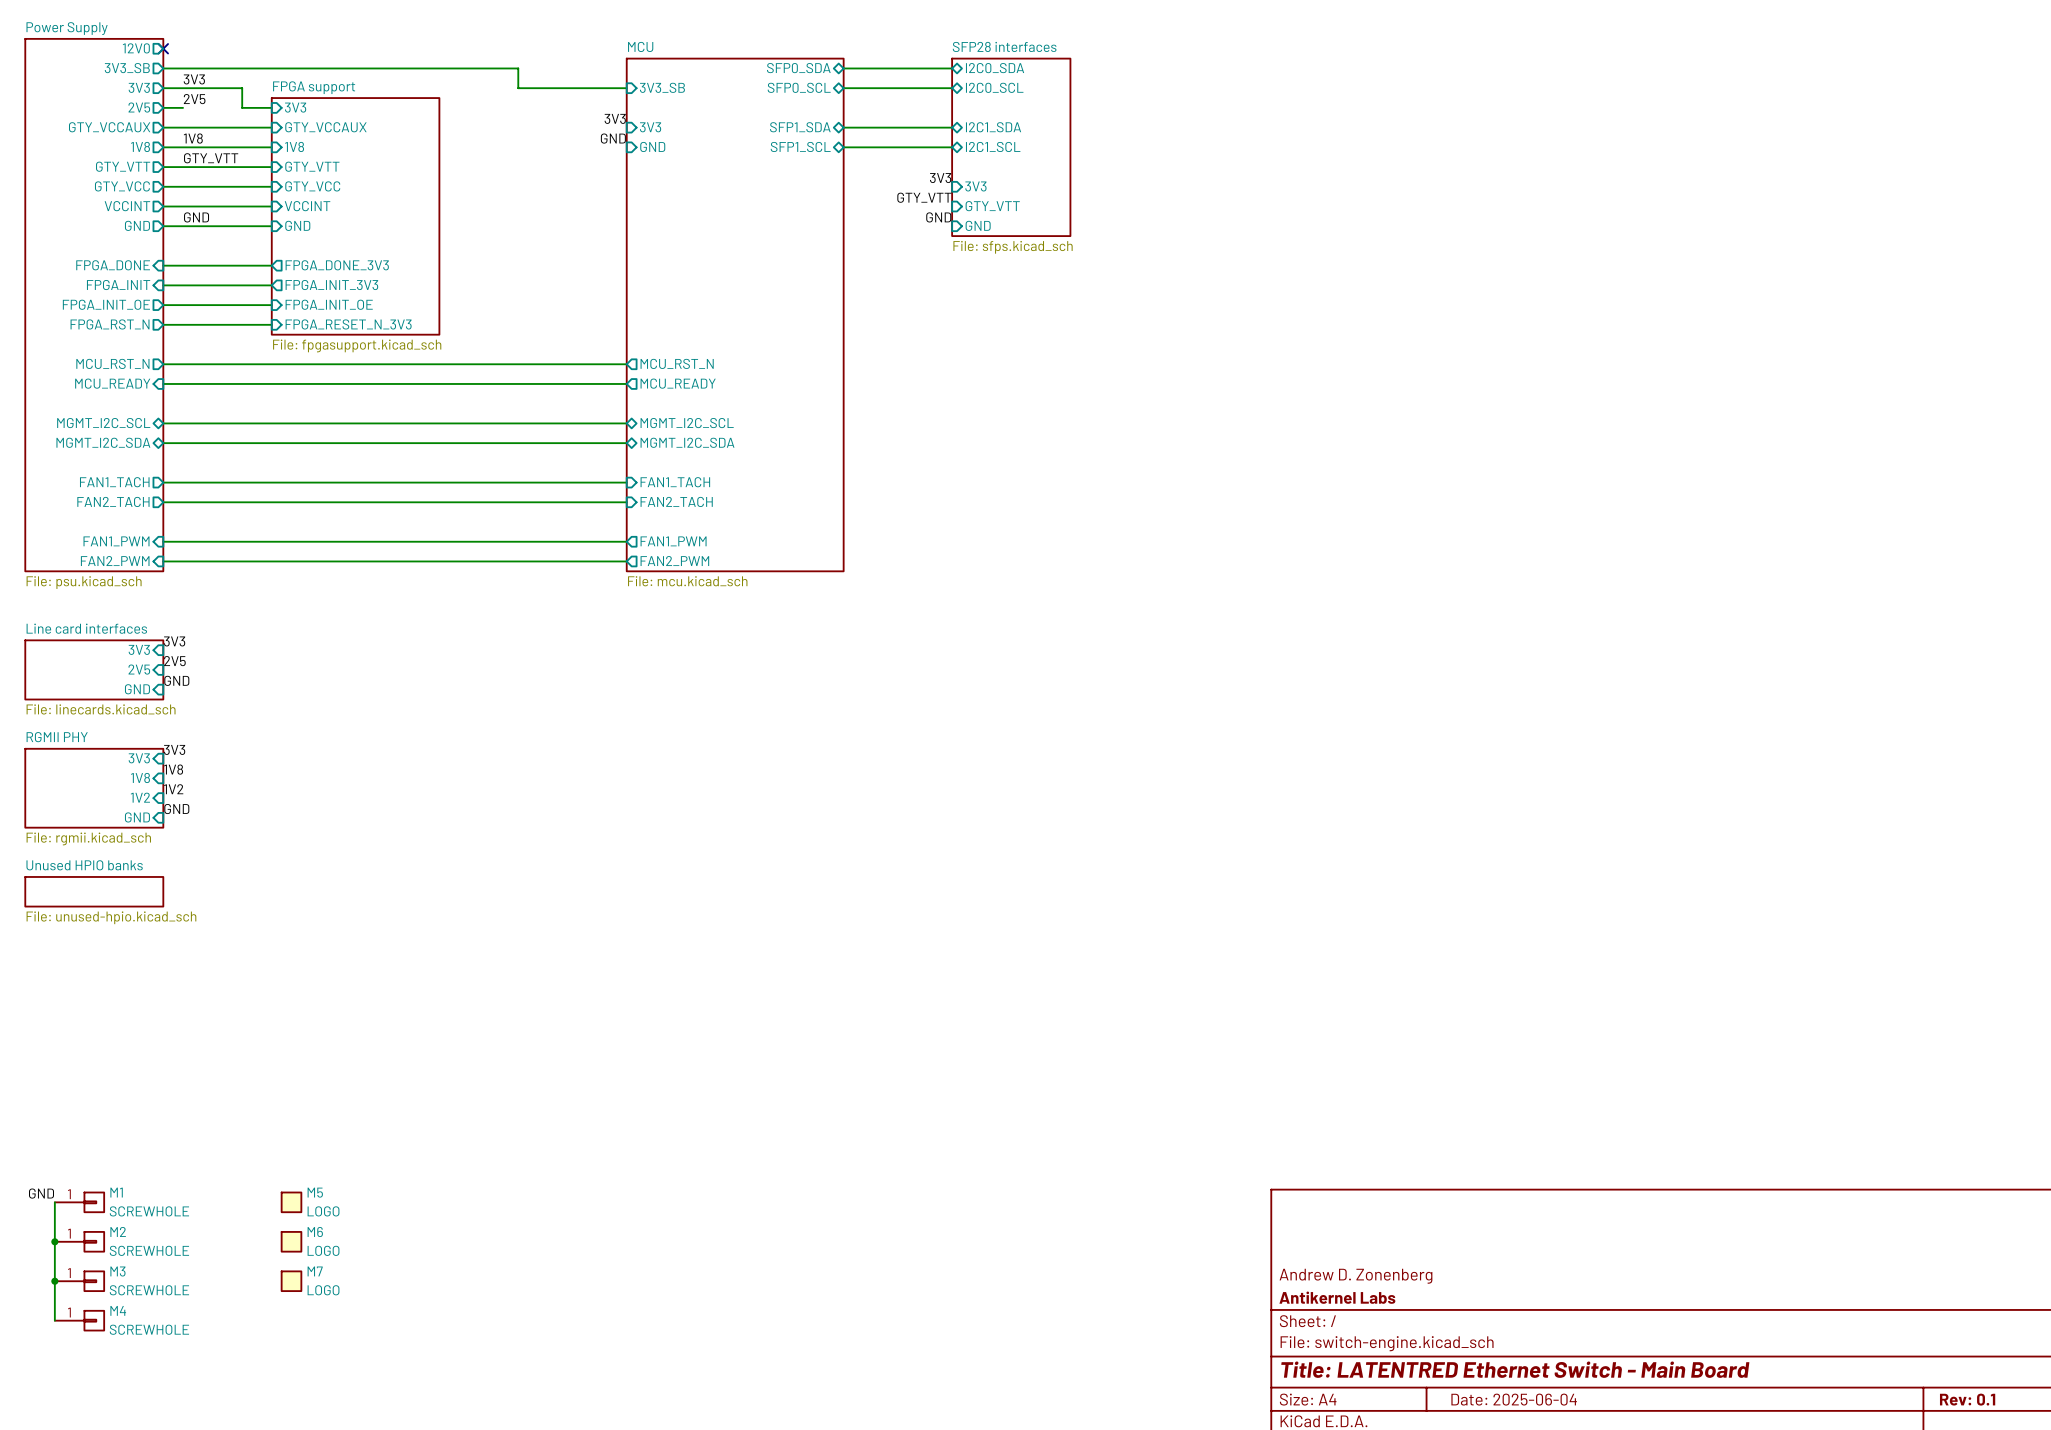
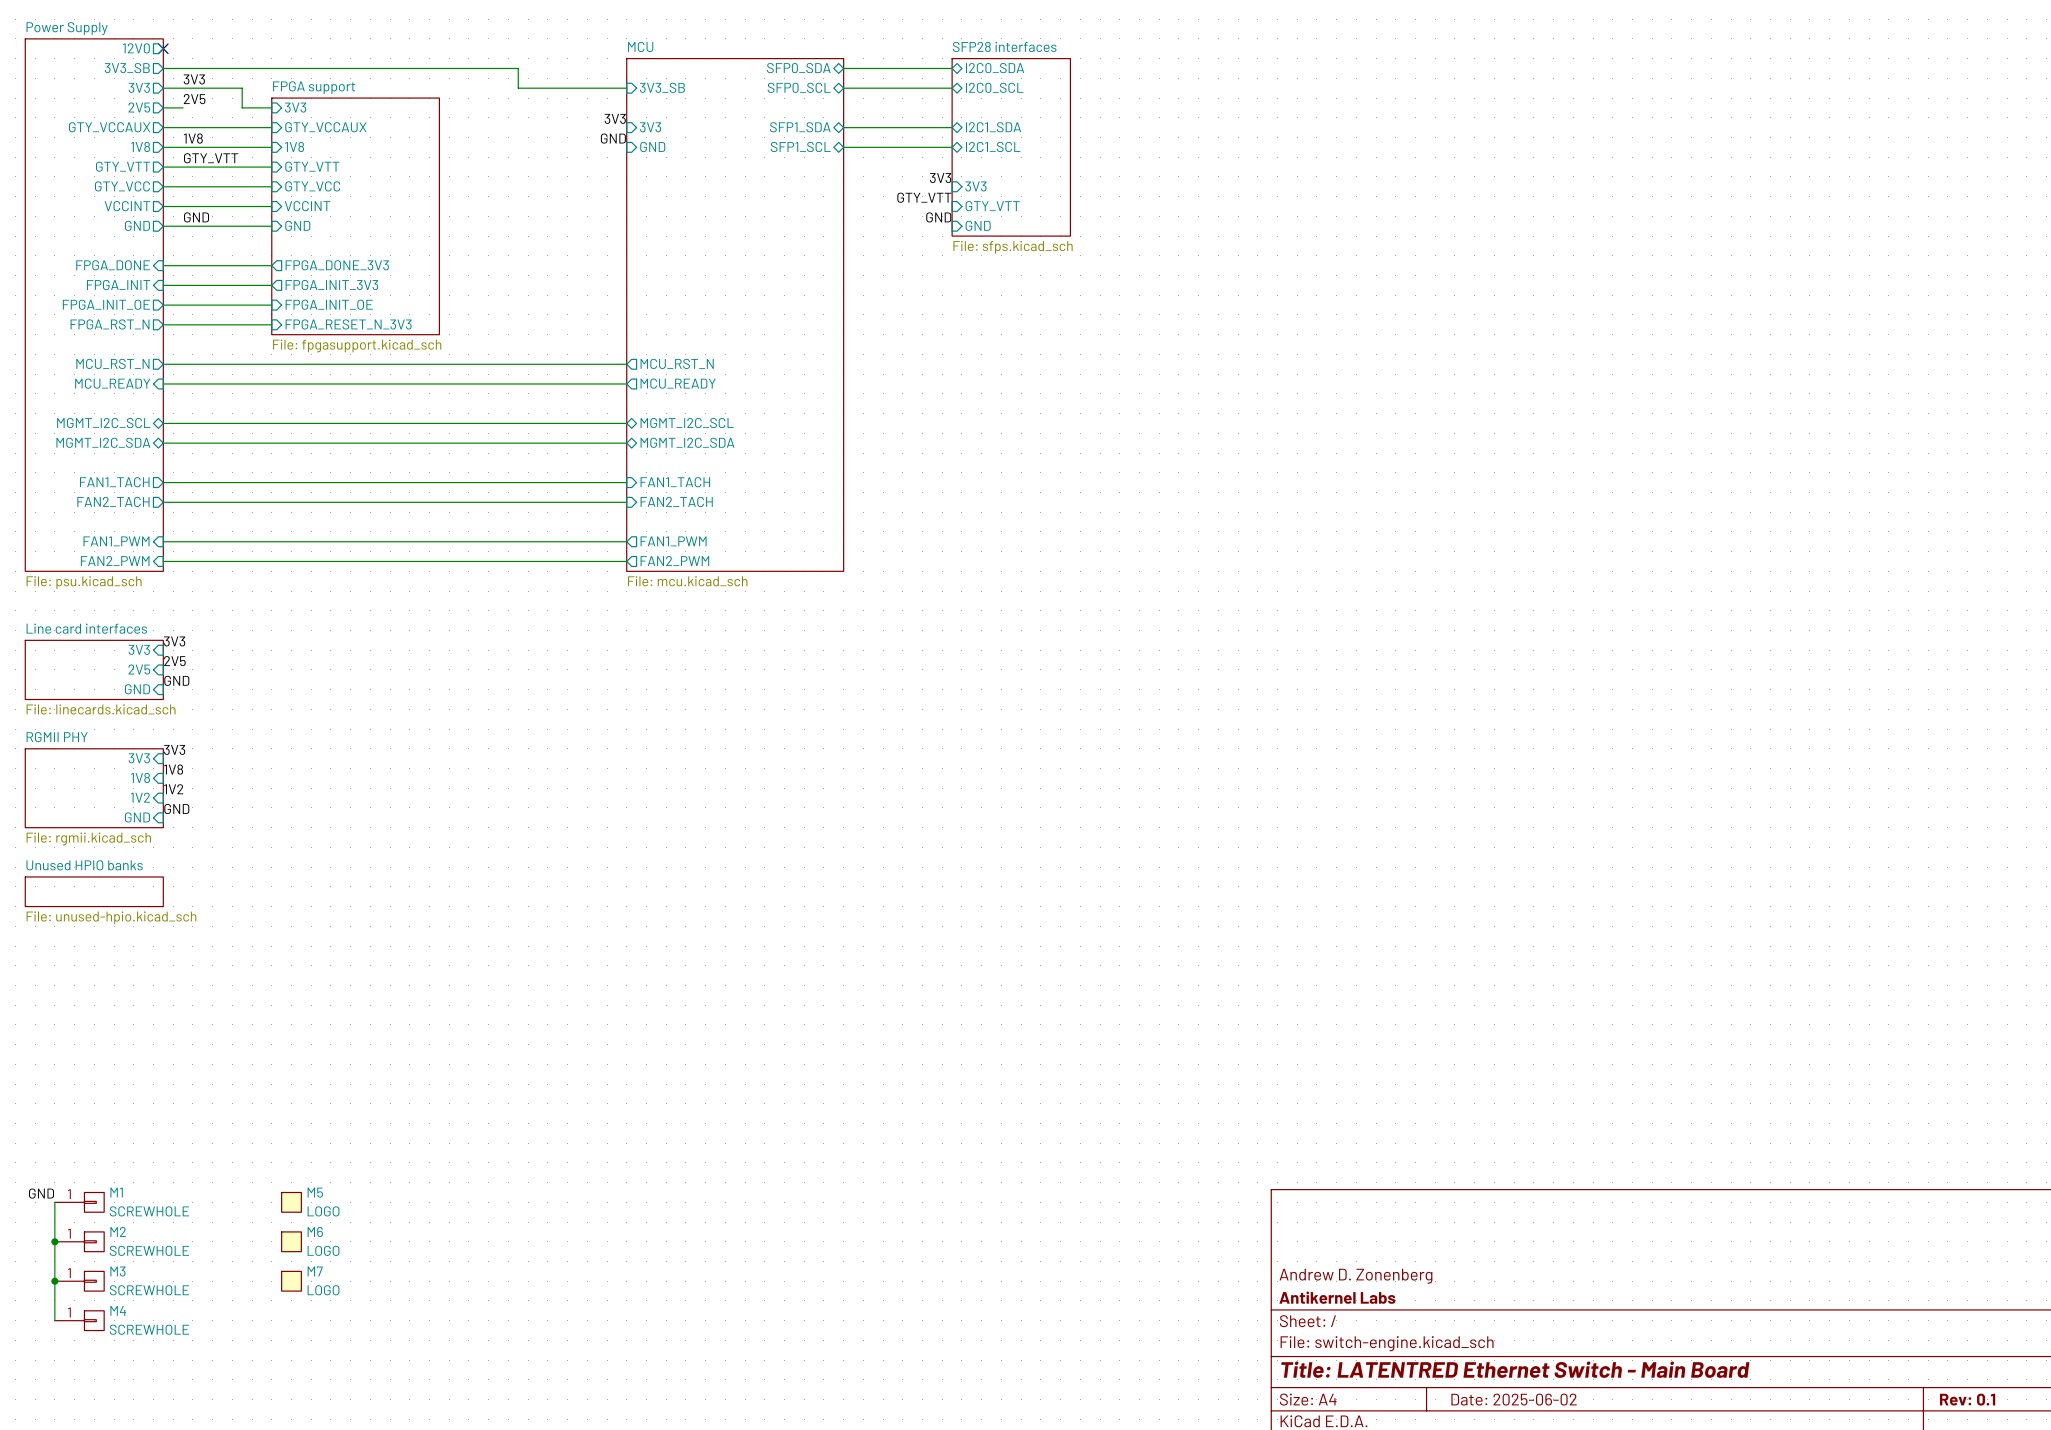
title block: Date: 2025-06-04 (1514, 1399) -> Date: 2025-06-02 (1514, 1399)

